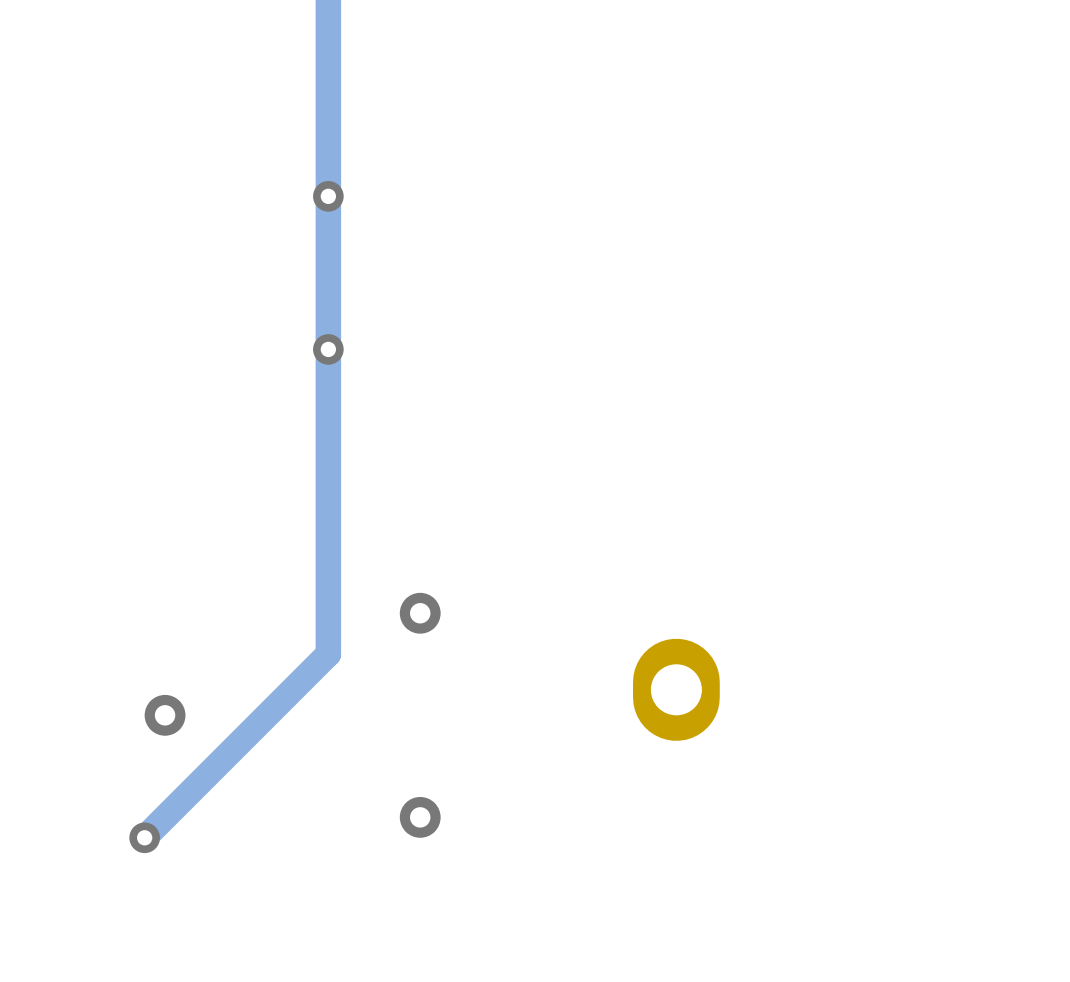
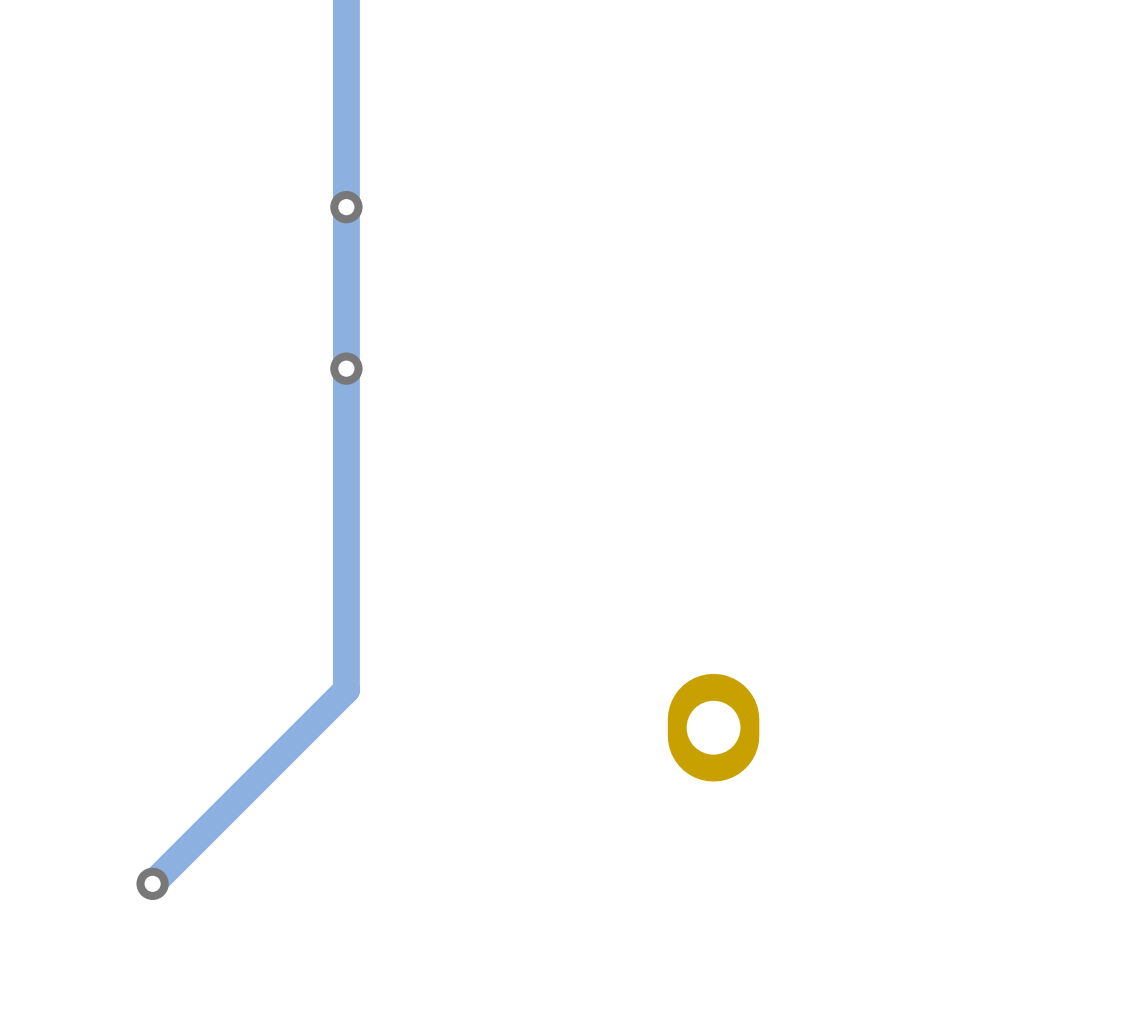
via: (420, 613) -> none
via: (165, 715) -> none
via: (420, 817) -> none

